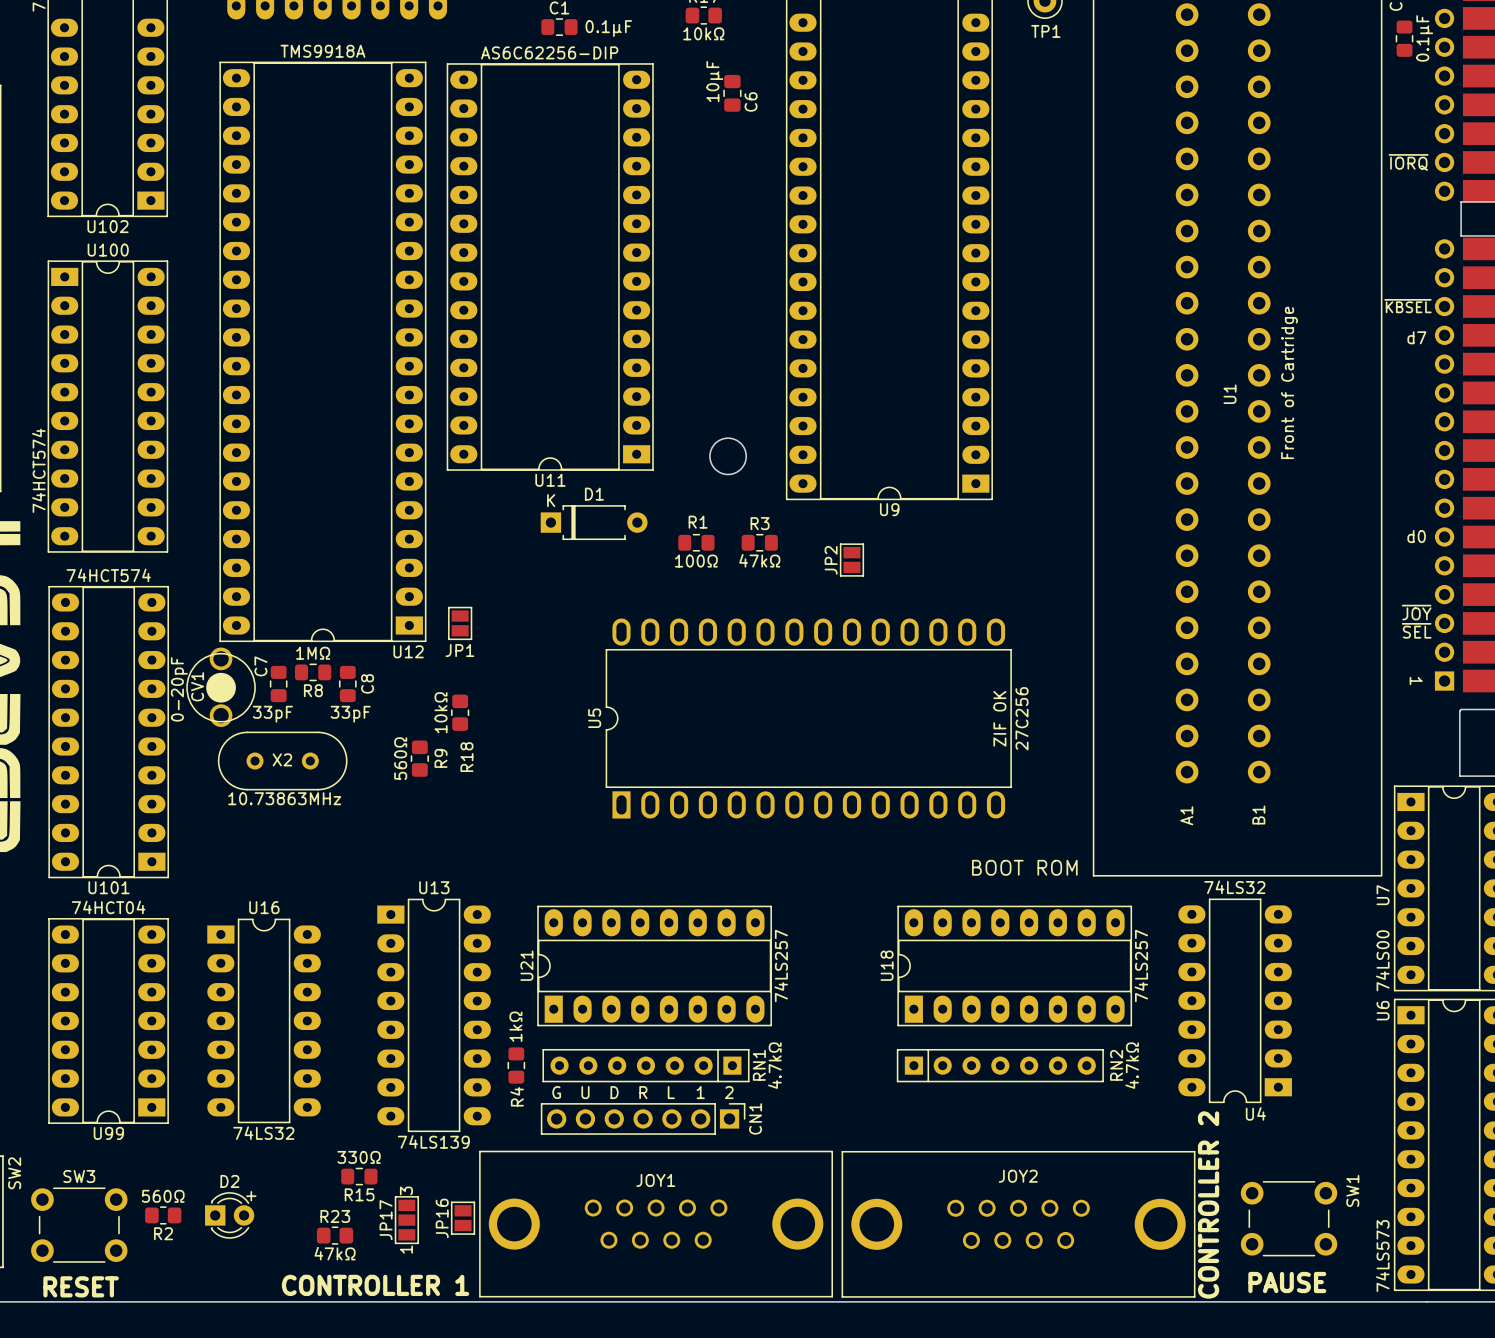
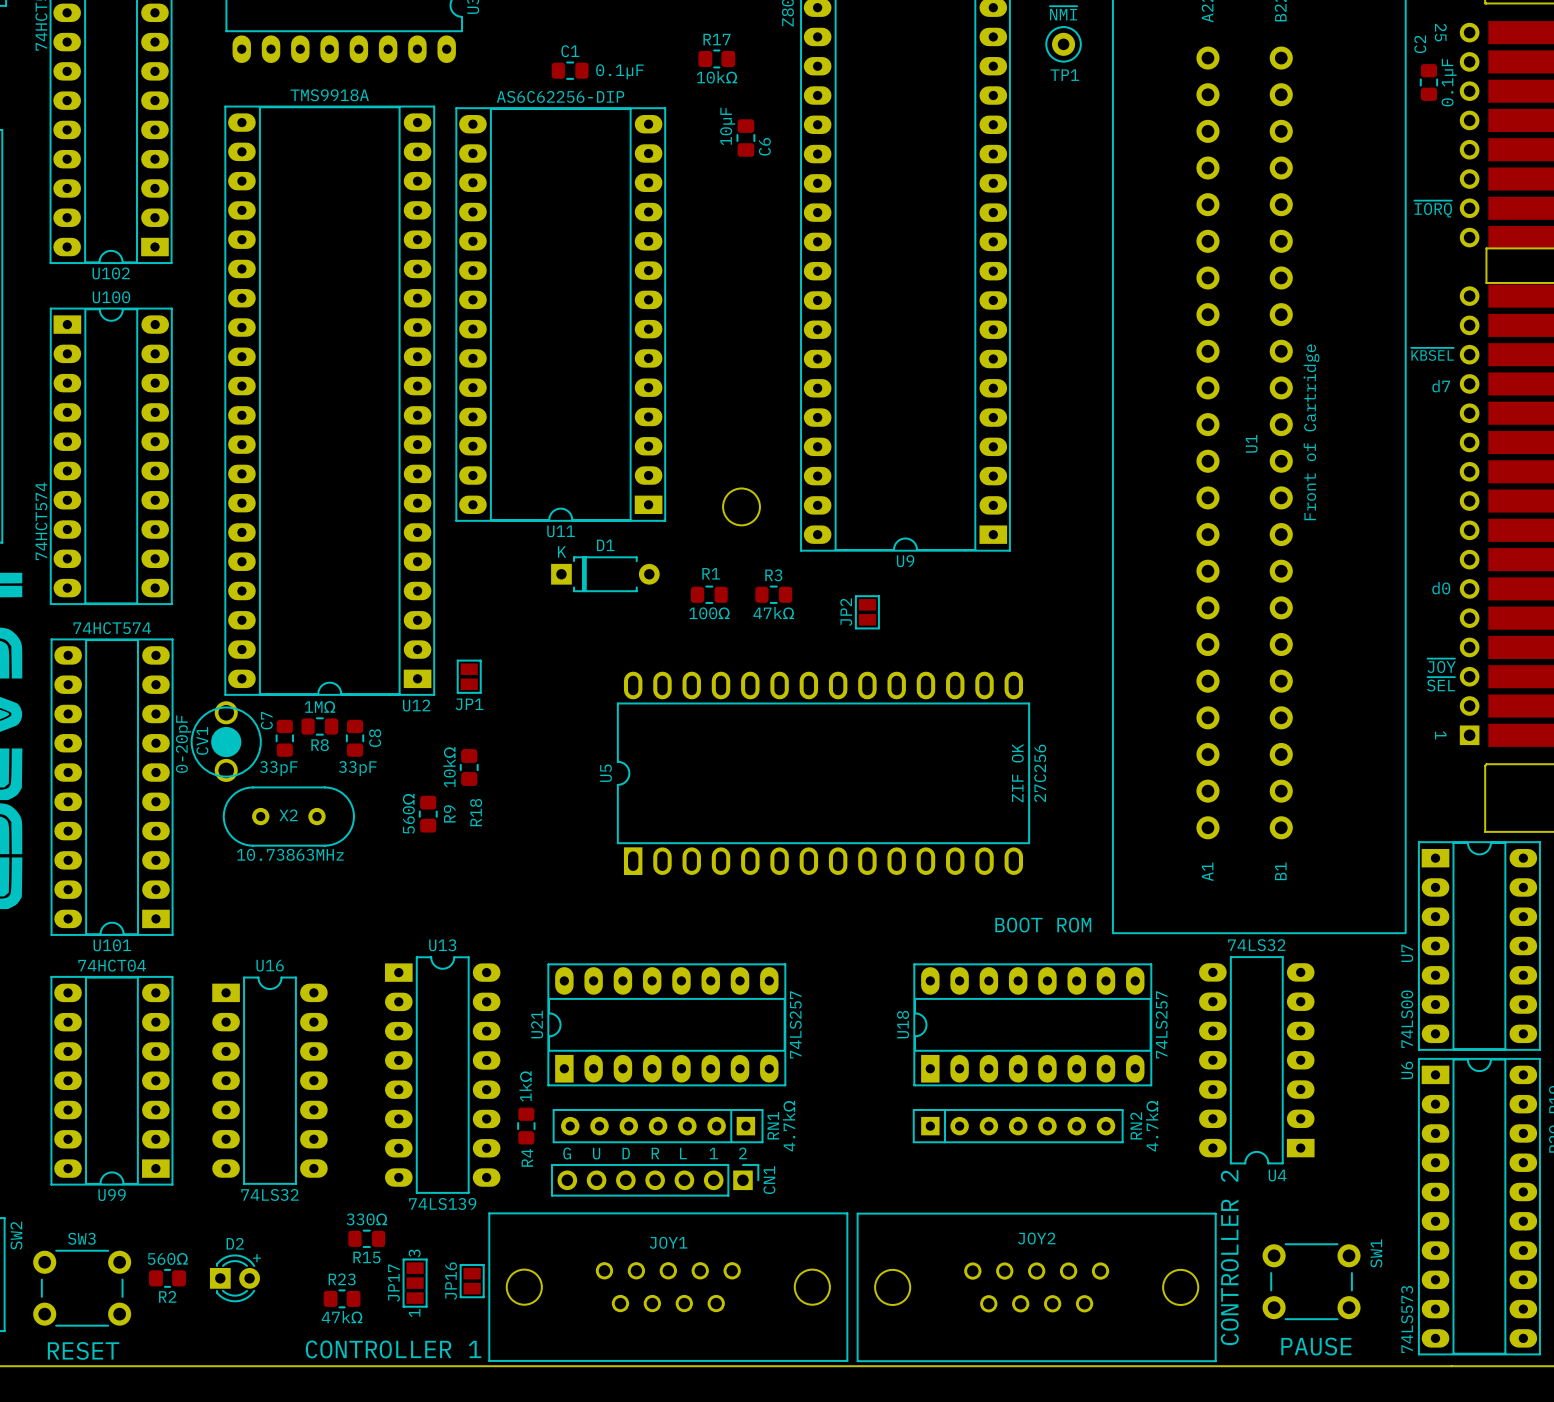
JOY1 footprint: [479, 1150, 833, 1298] -> [488, 1212, 849, 1362]
JOY2 footprint: [841, 1151, 1196, 1298] -> [856, 1212, 1217, 1362]

